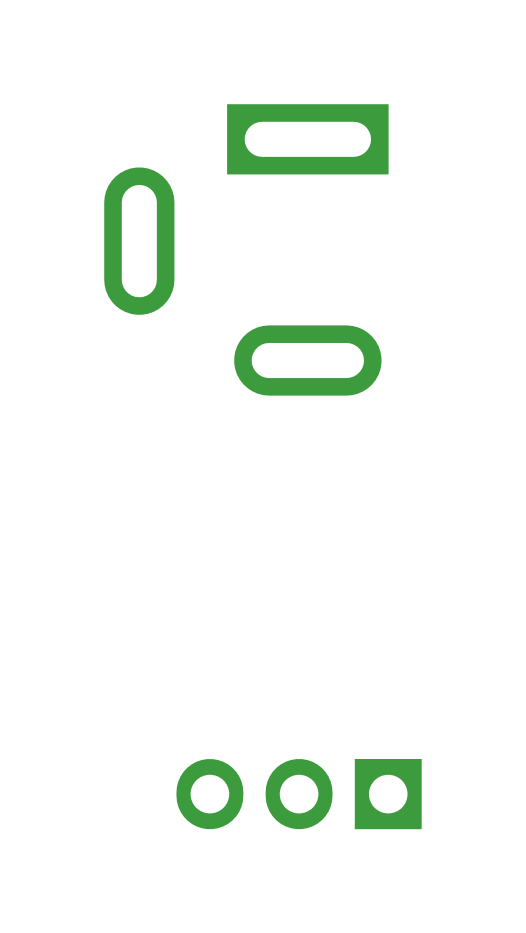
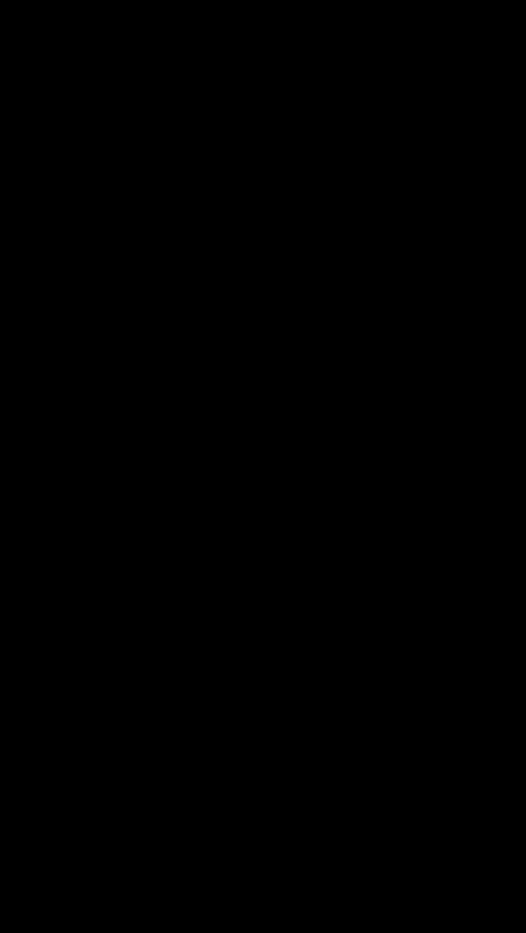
part: (246, 249) -> none
part: (299, 794) -> none

